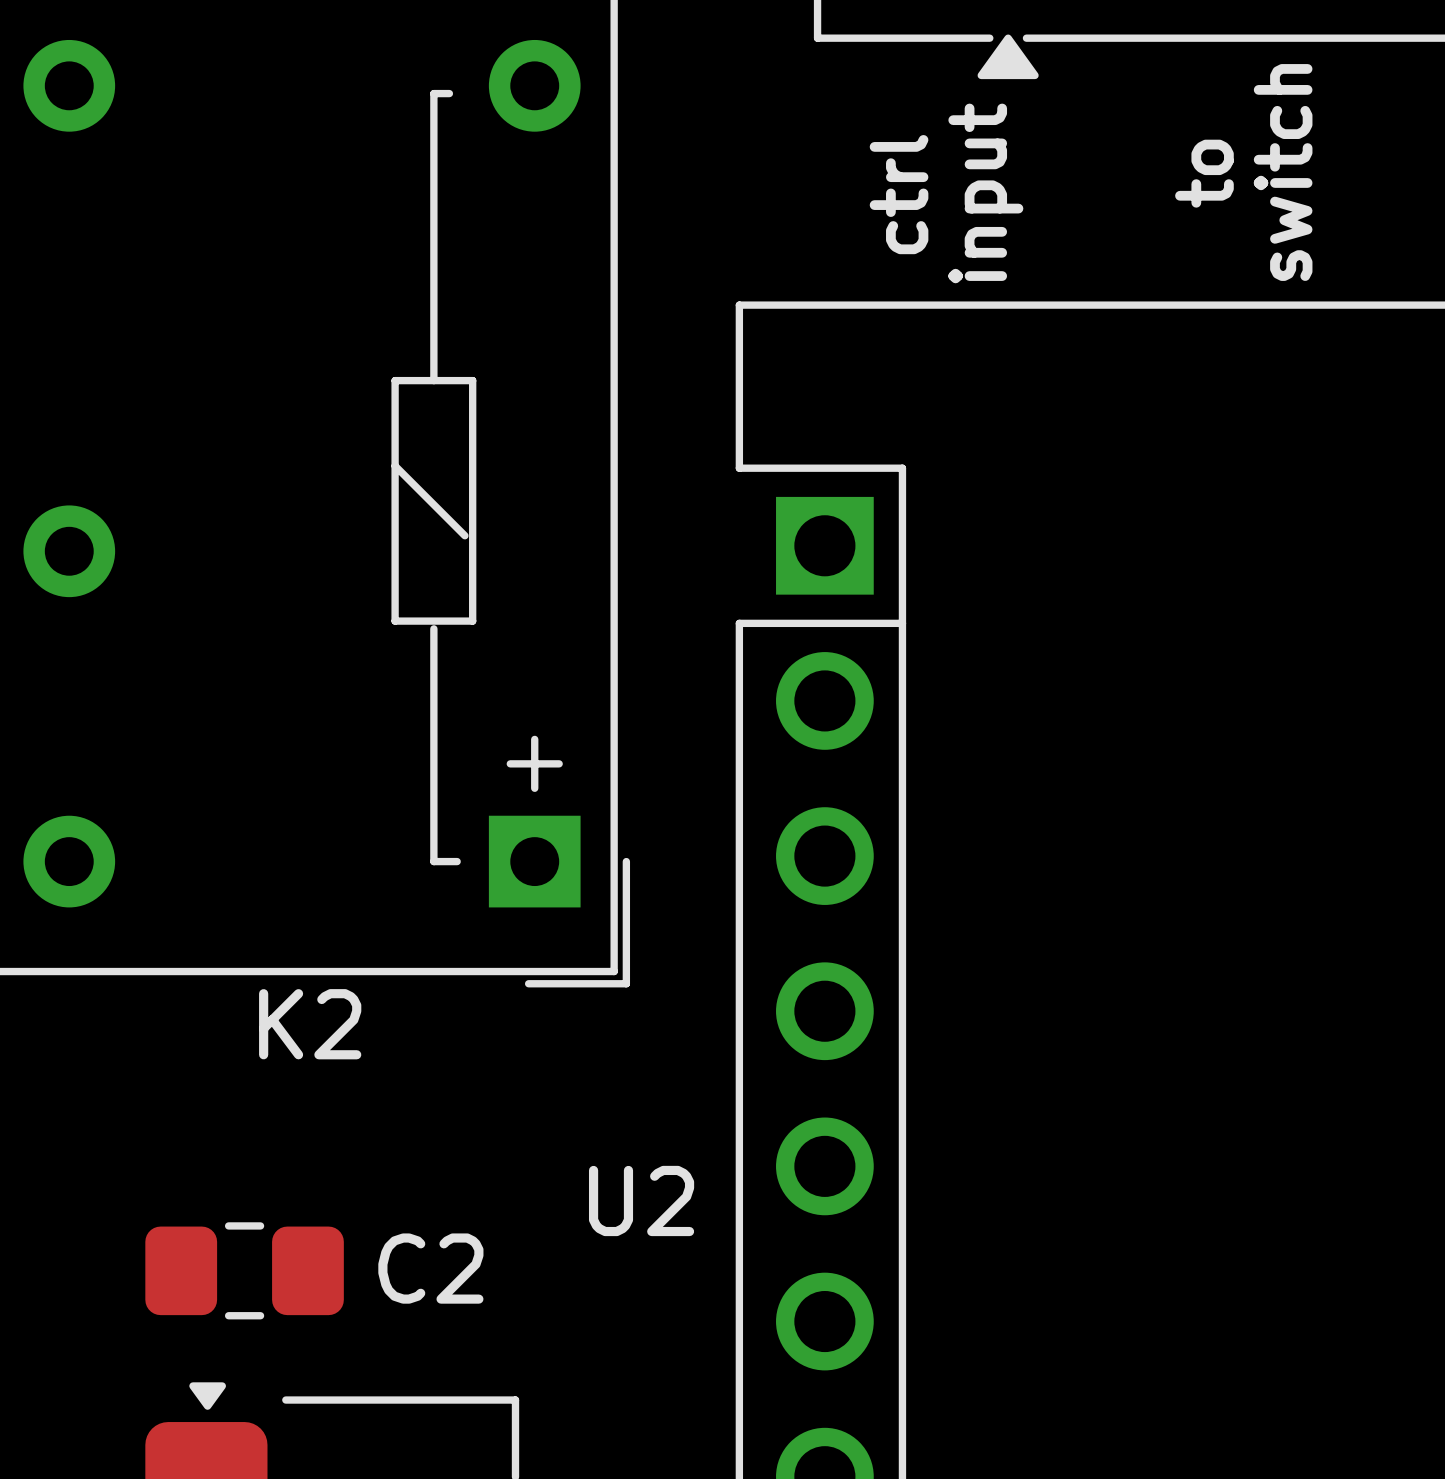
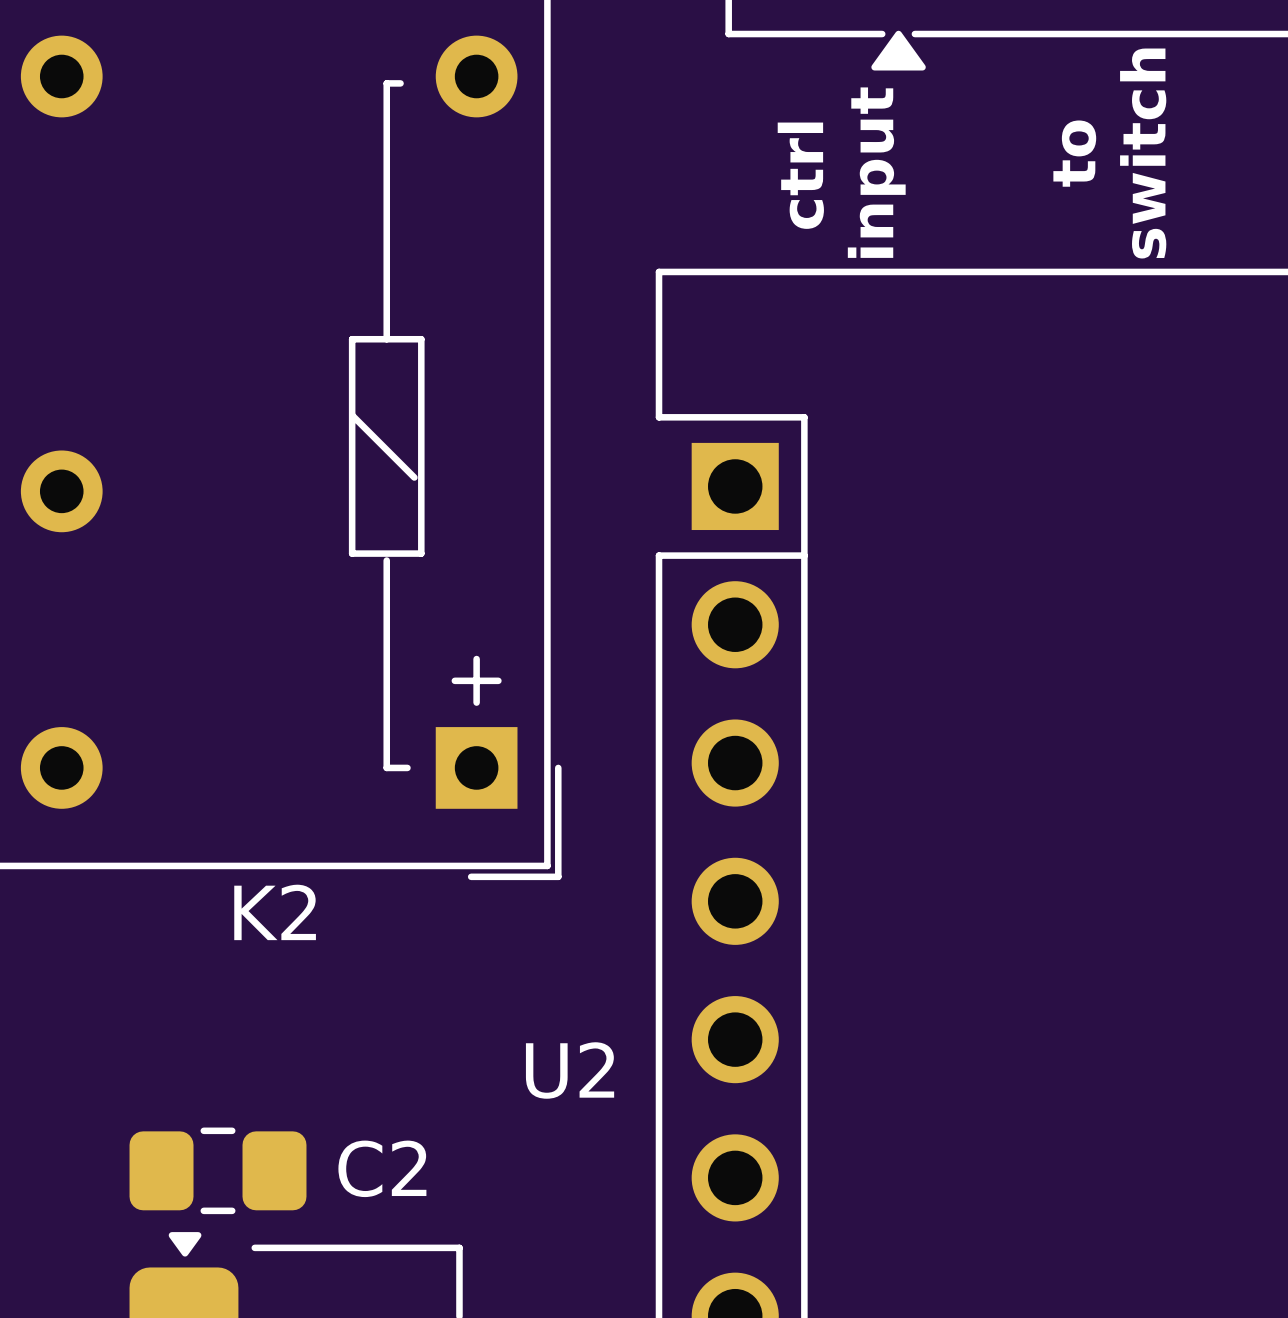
C2 position: (244, 1270) -> (218, 1170)

